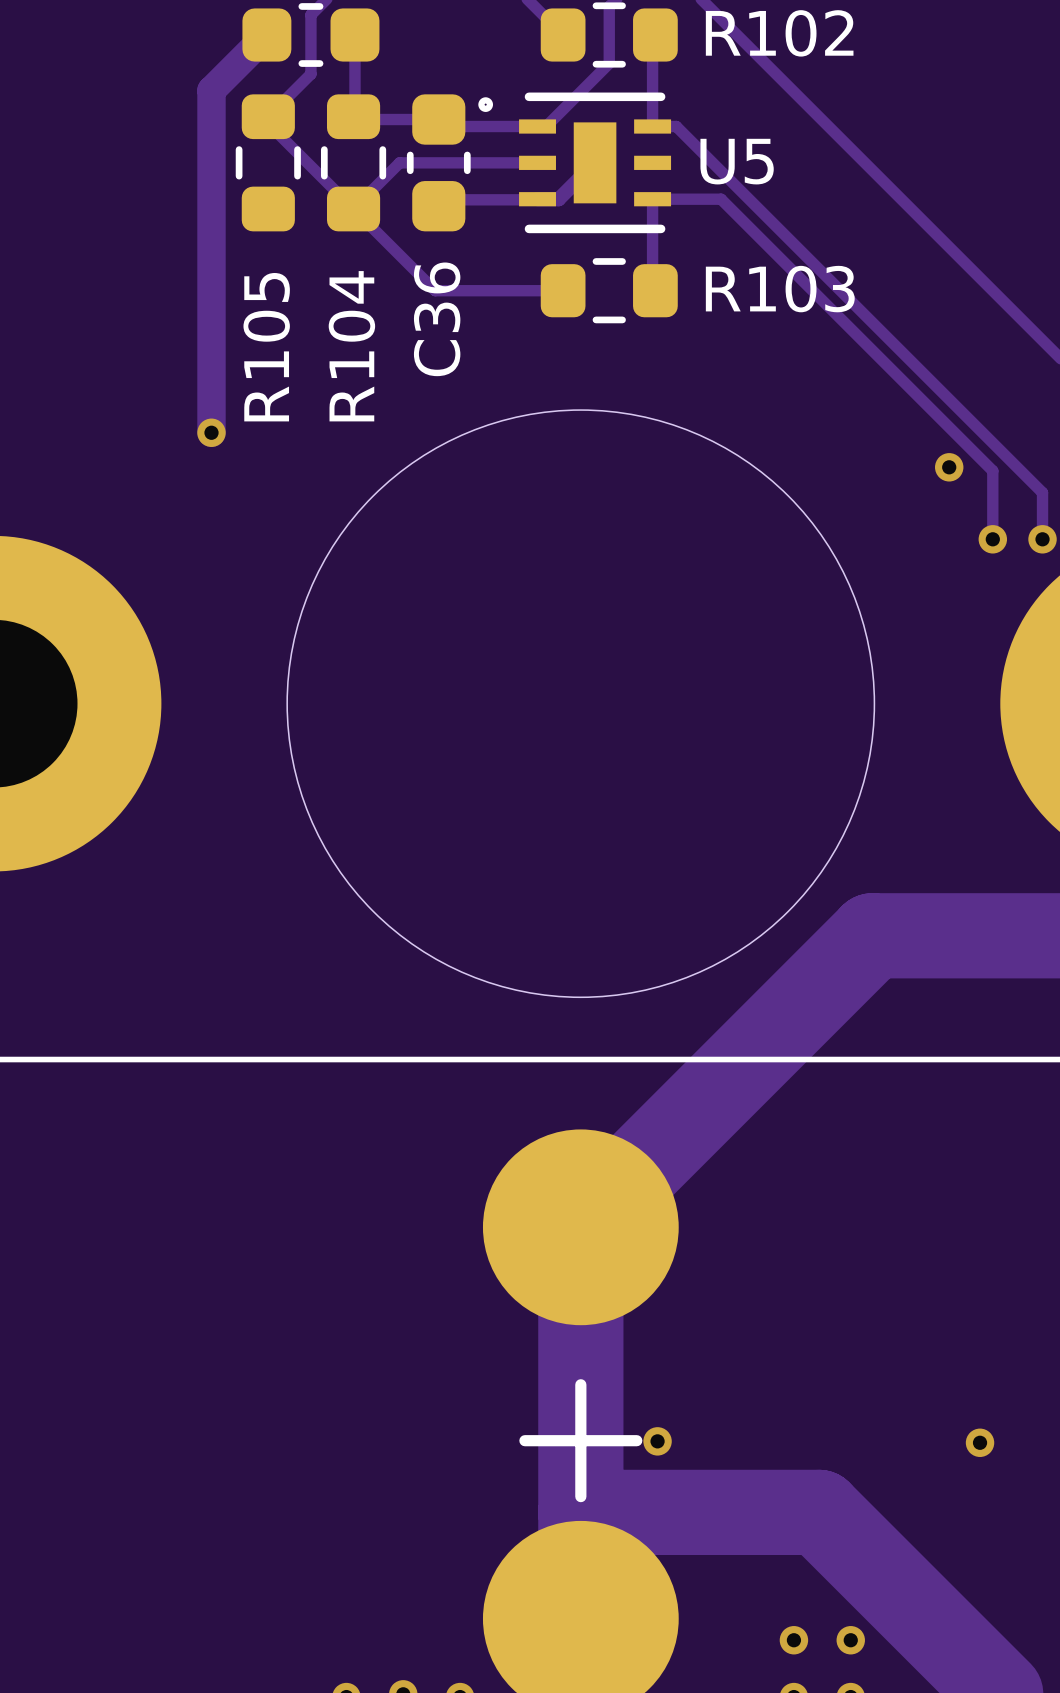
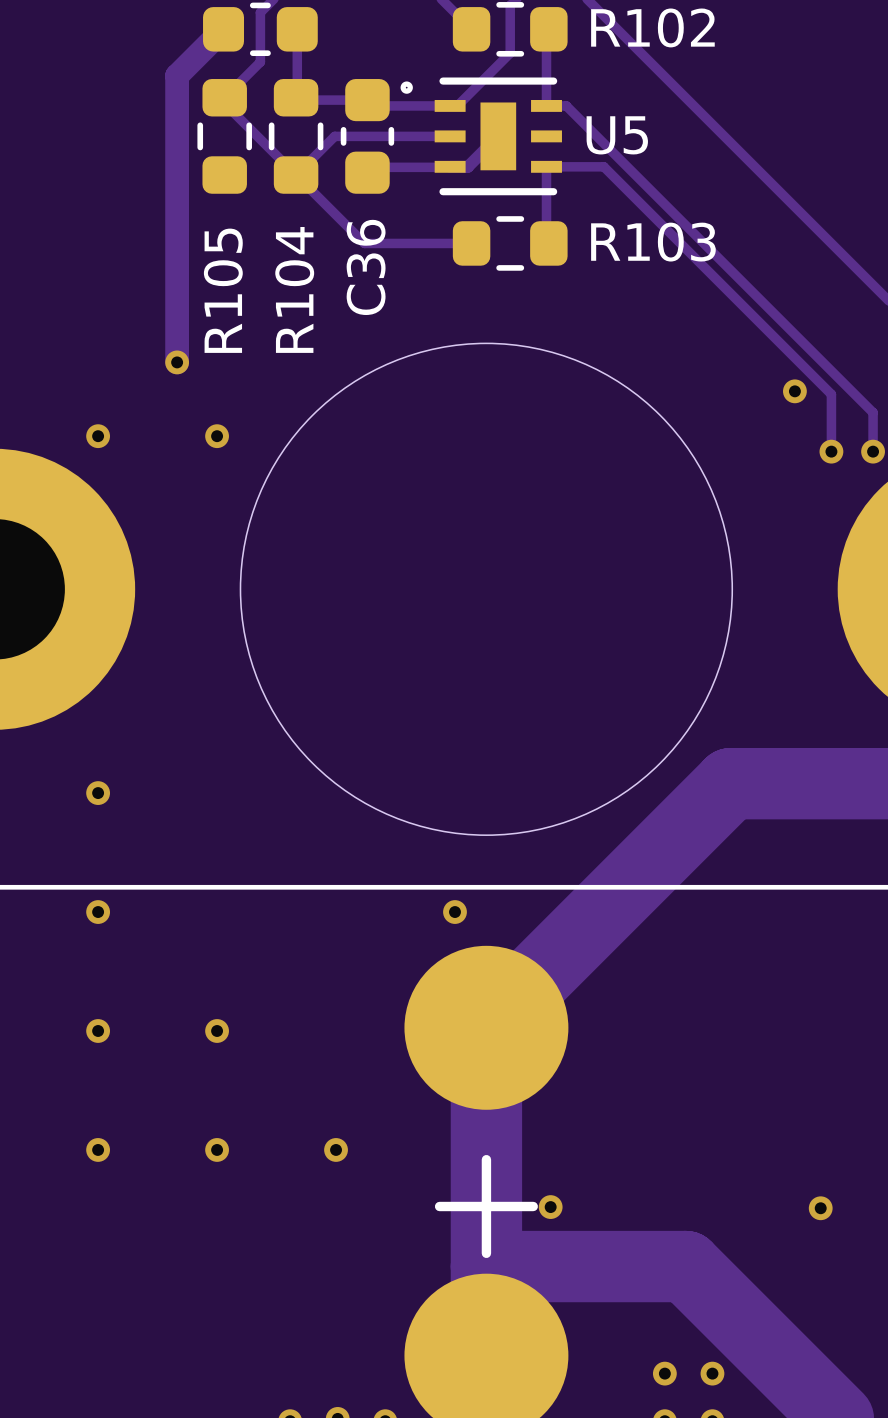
via: none -> (98, 436)
via: none -> (217, 436)
via: none -> (98, 793)
via: none -> (98, 912)
via: none -> (455, 912)
via: none -> (98, 1031)
via: none -> (217, 1031)
via: none -> (98, 1149)
via: none -> (217, 1149)
via: none -> (336, 1149)

